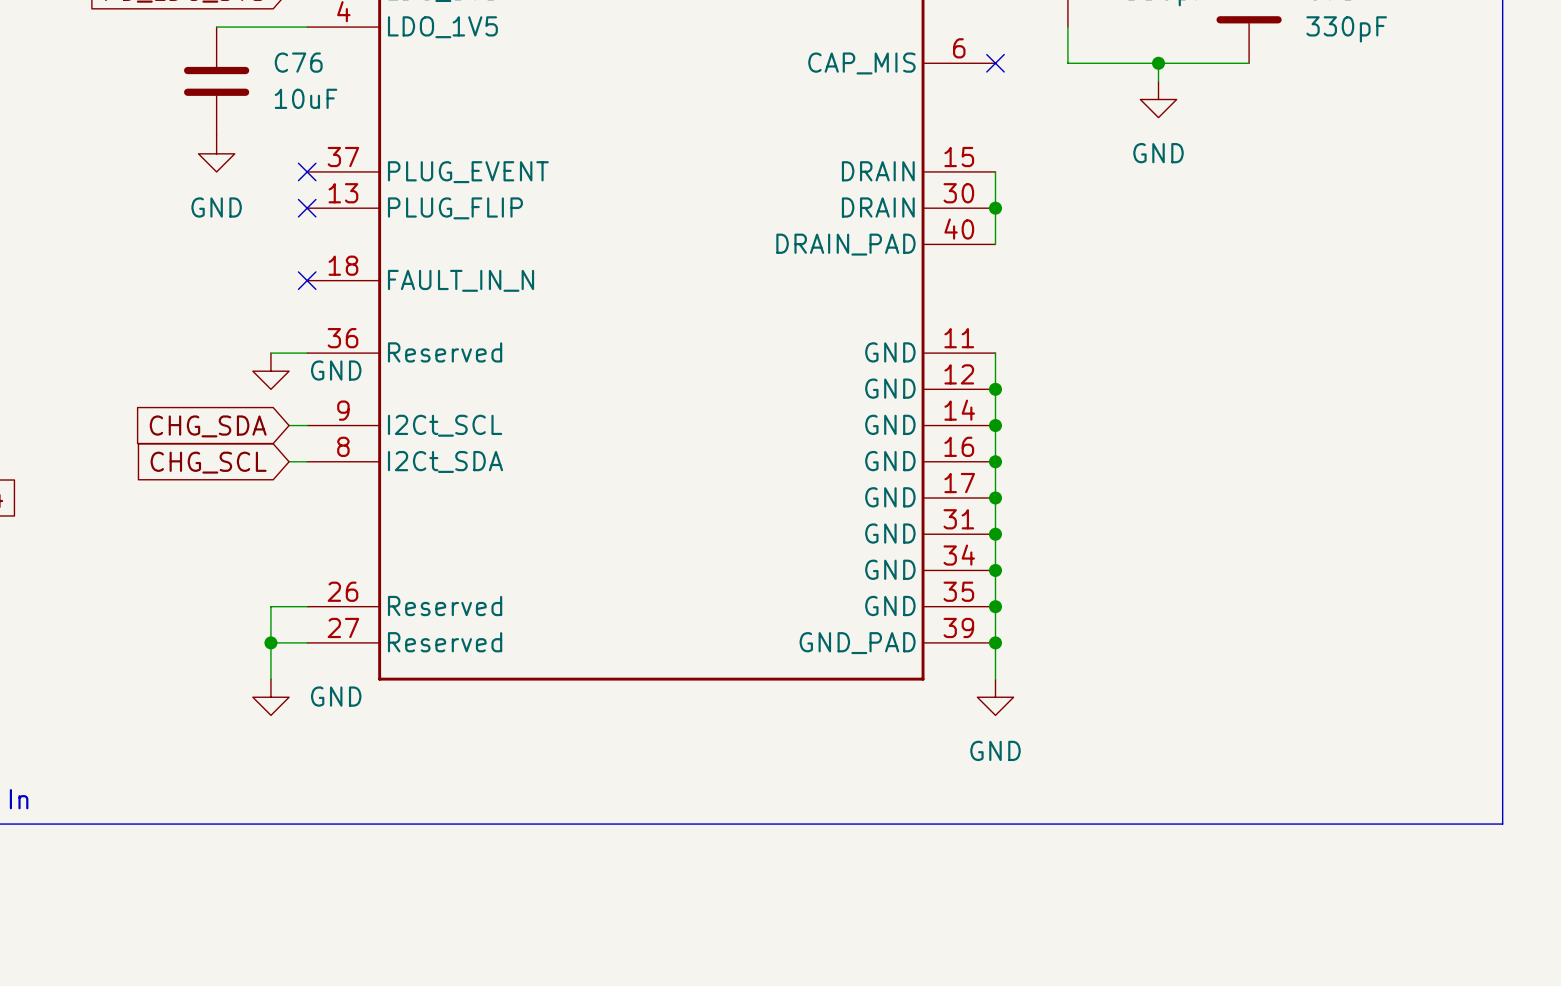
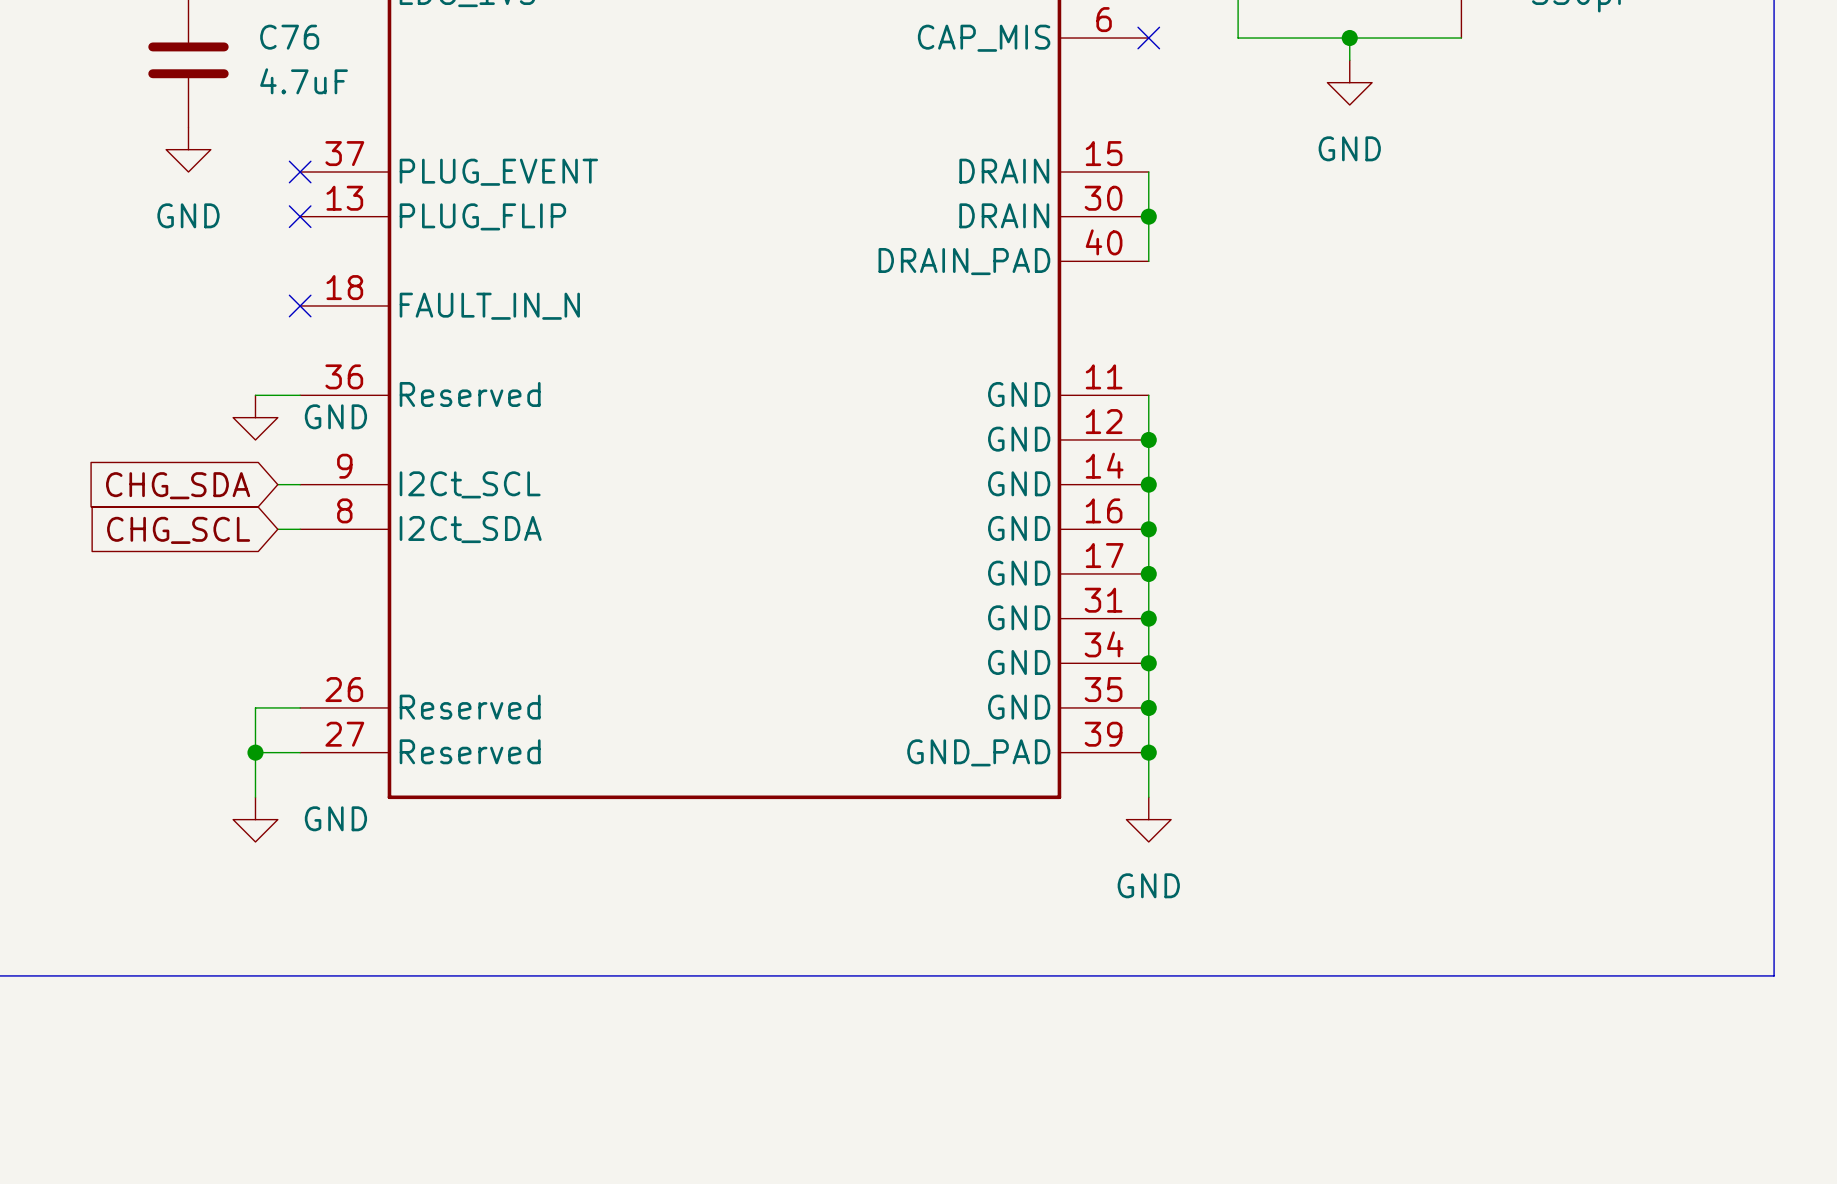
C76 value: 10uF (306, 98) -> 4.7uF (304, 81)

